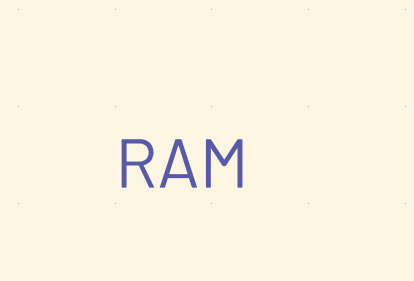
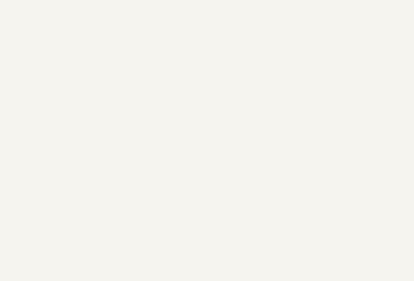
text: RAM (182, 163) -> none

